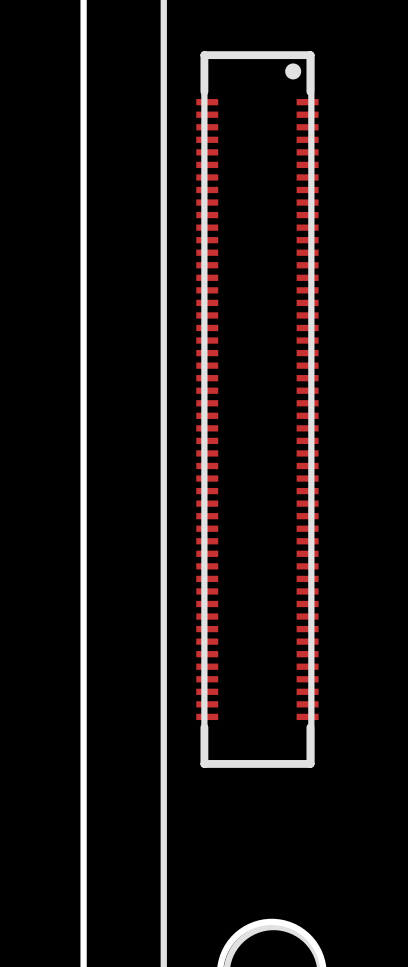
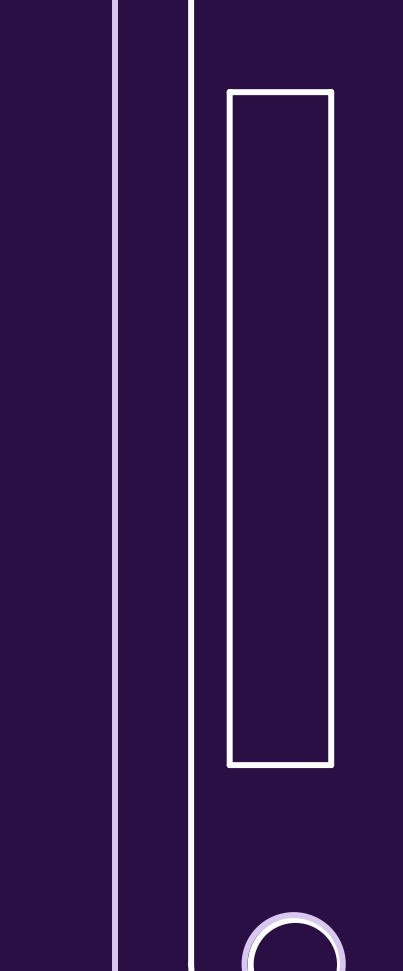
part: (257, 409) -> none

